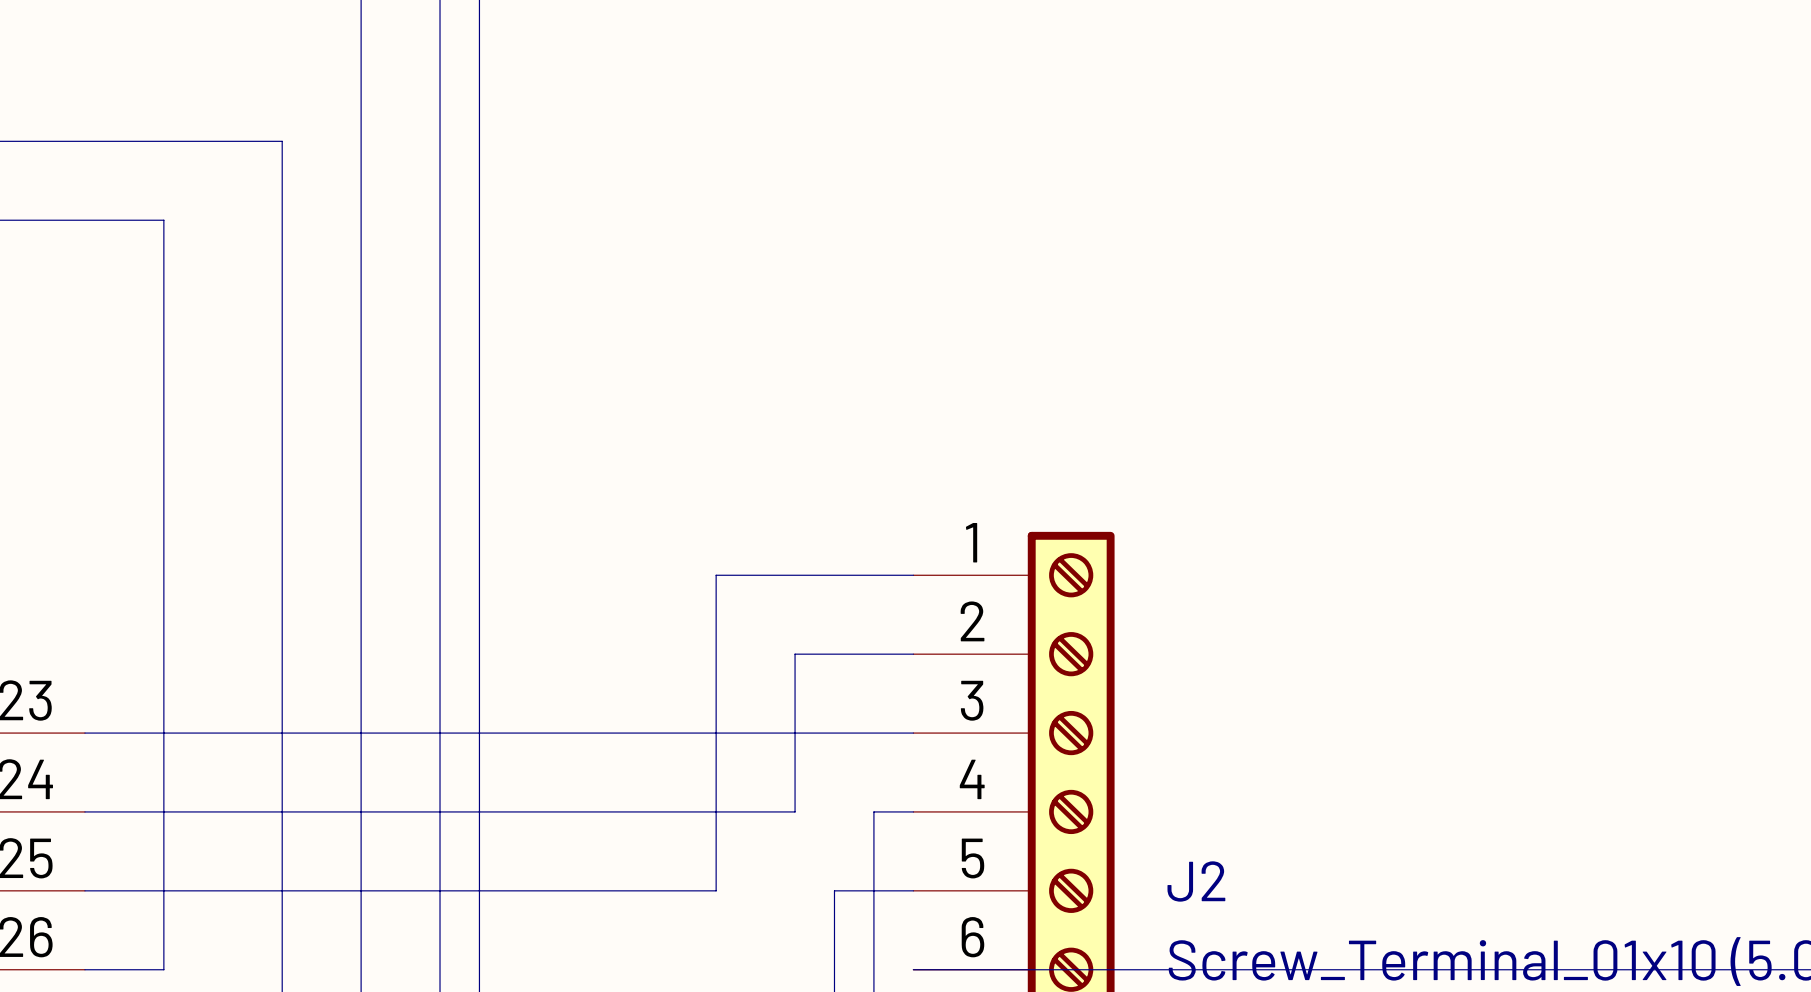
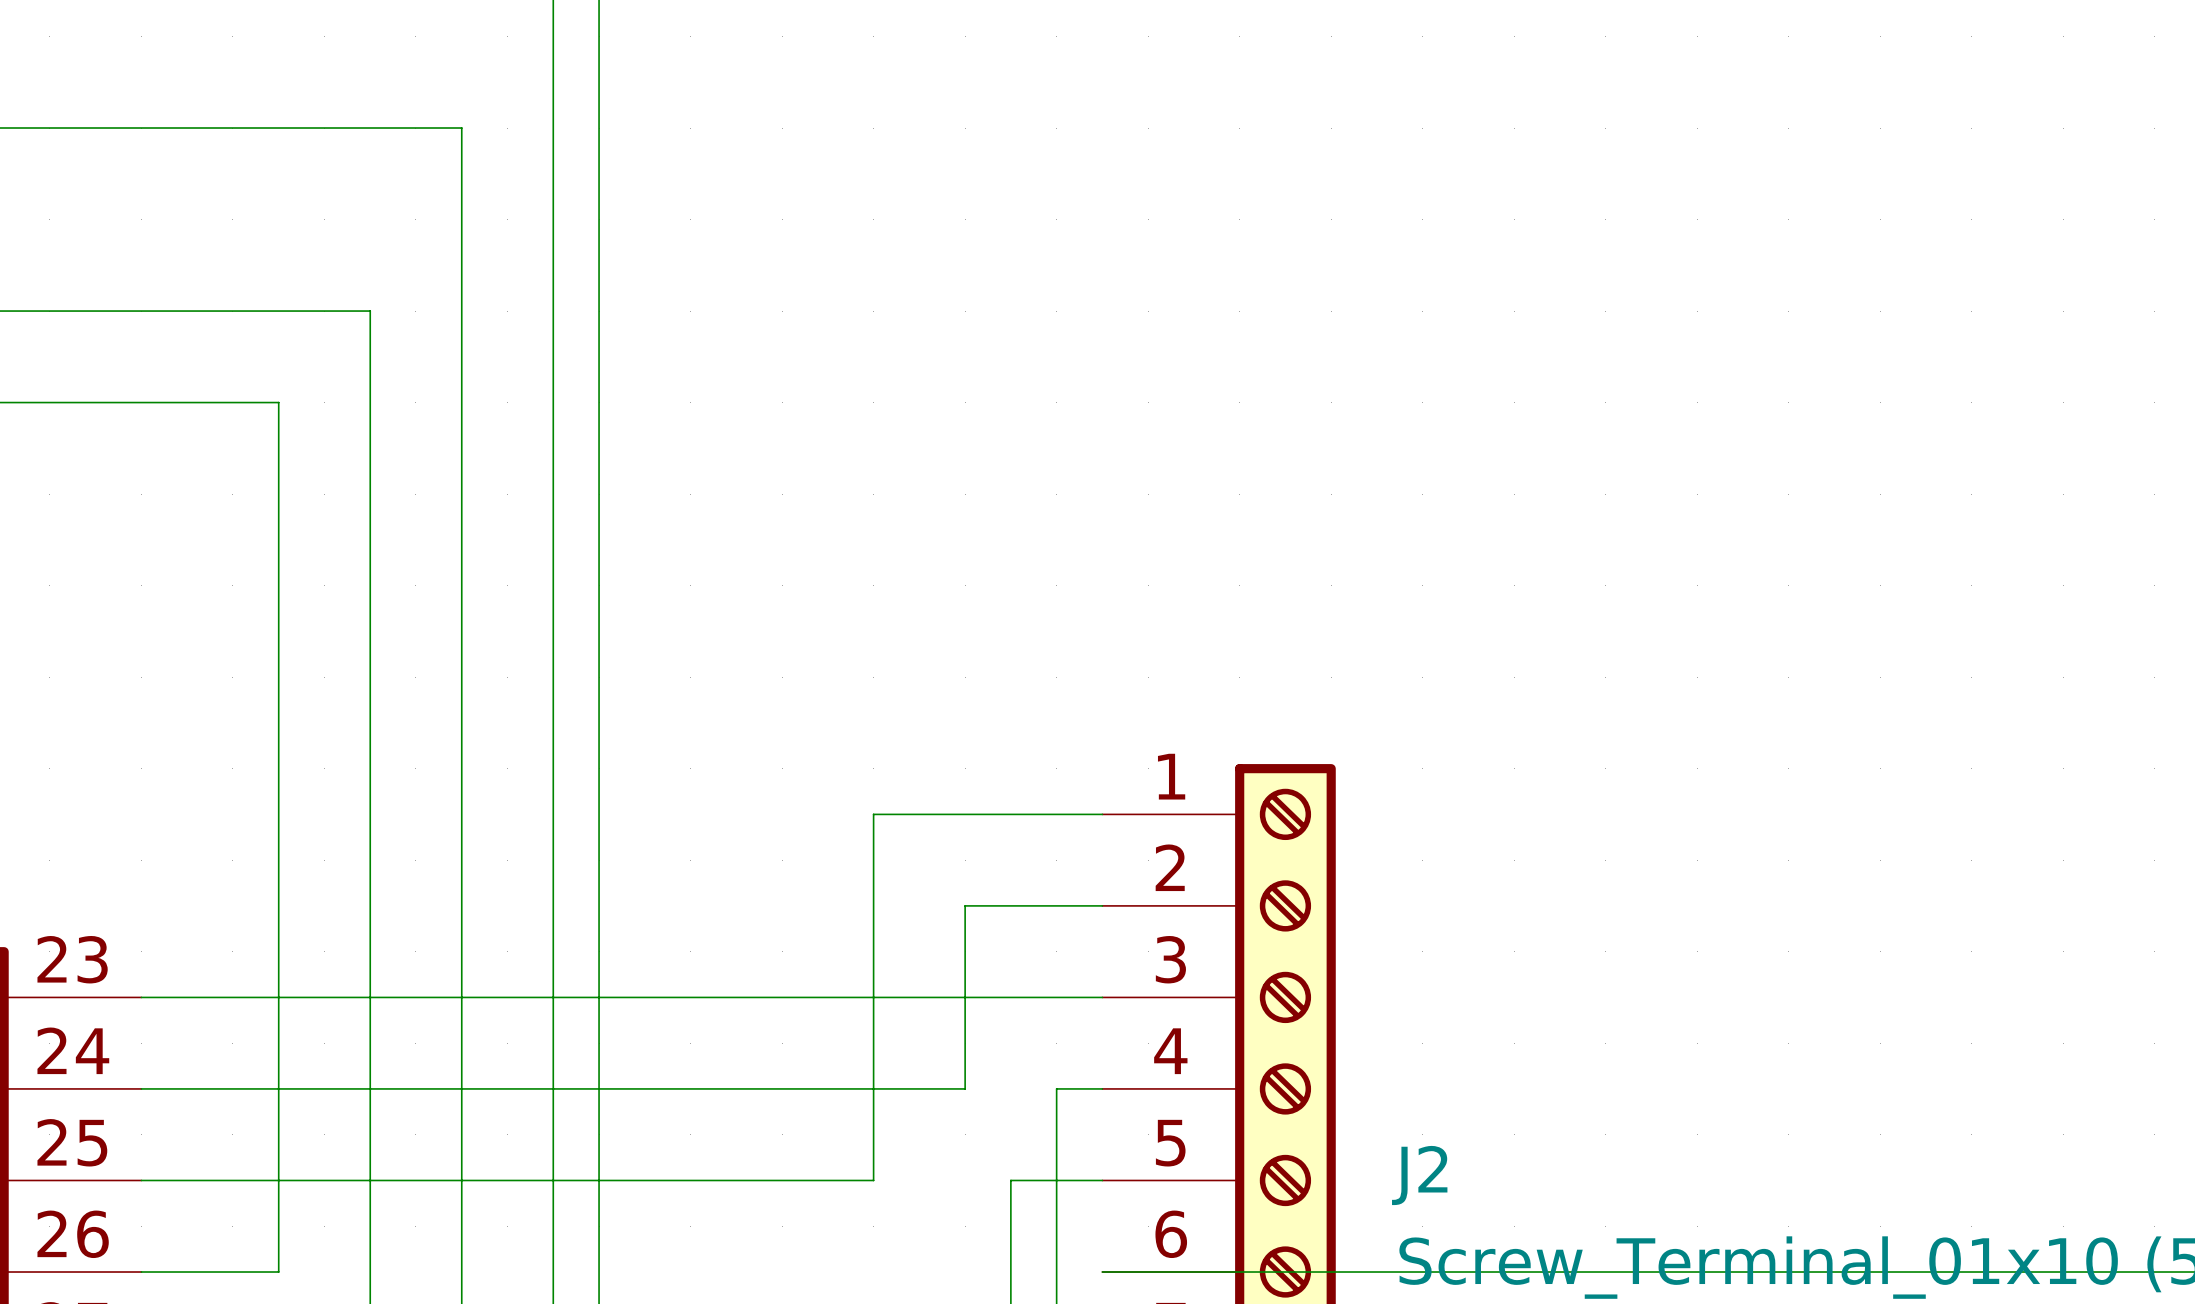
wire: (163, 220) (163, 969) -> (232, 402) (278, 402) (278, 1272) (232, 1272)

